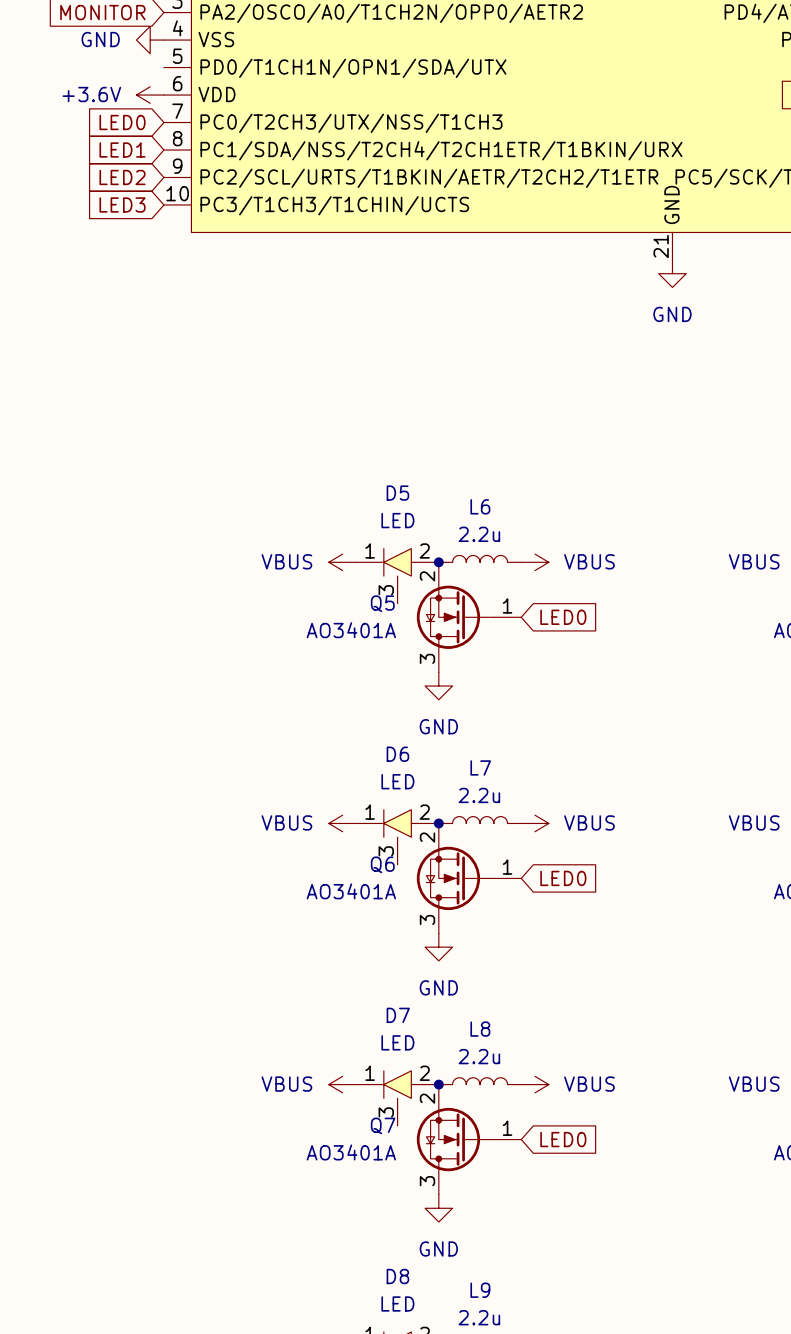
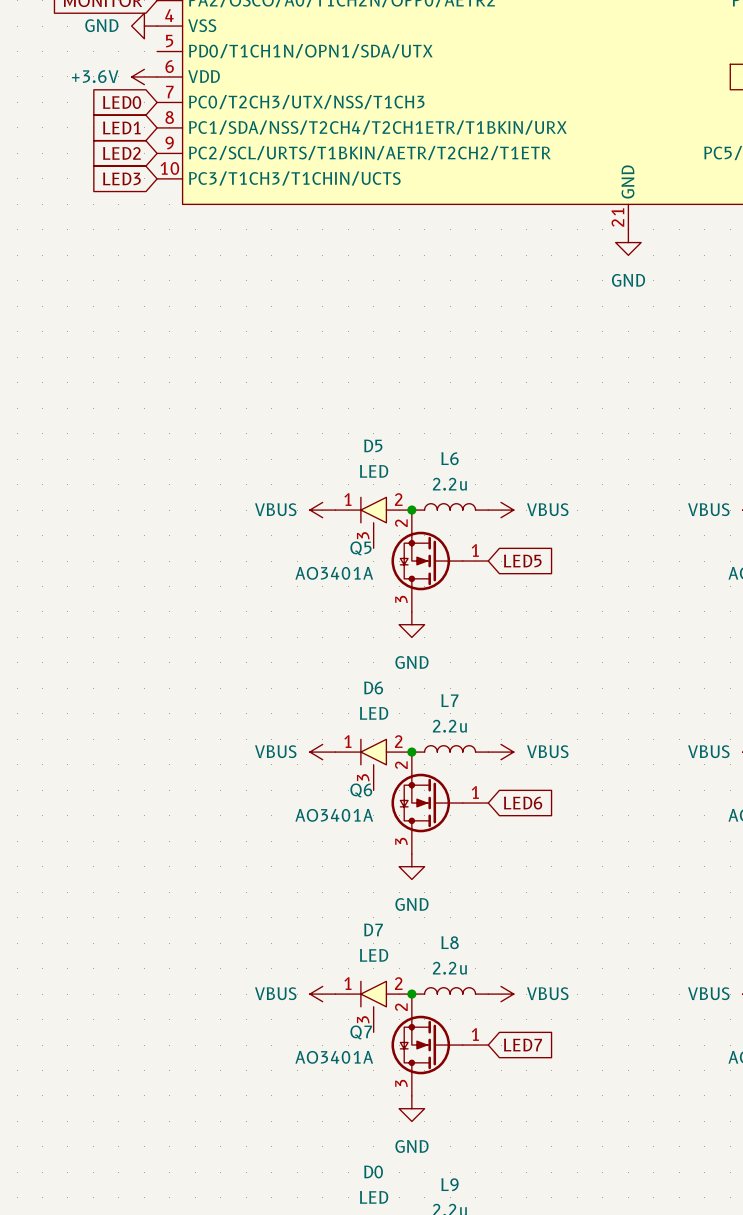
global label: LED0 (563, 617) -> LED5 (522, 561)
global label: LED0 (563, 878) -> LED6 (523, 803)
global label: LED0 (563, 1139) -> LED7 (522, 1045)
D8 name: D8 (397, 1276) -> D0 (373, 1172)

